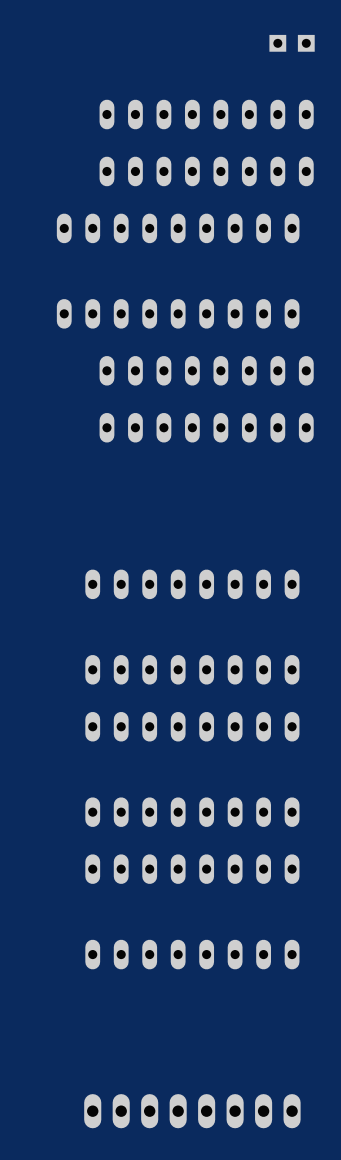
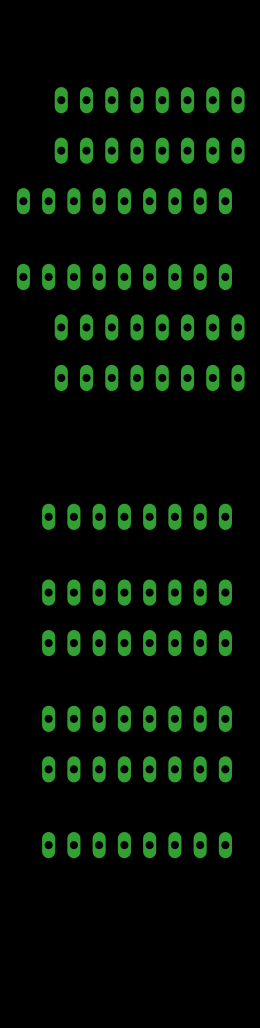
part: (292, 43) -> none
part: (192, 1111) -> none

